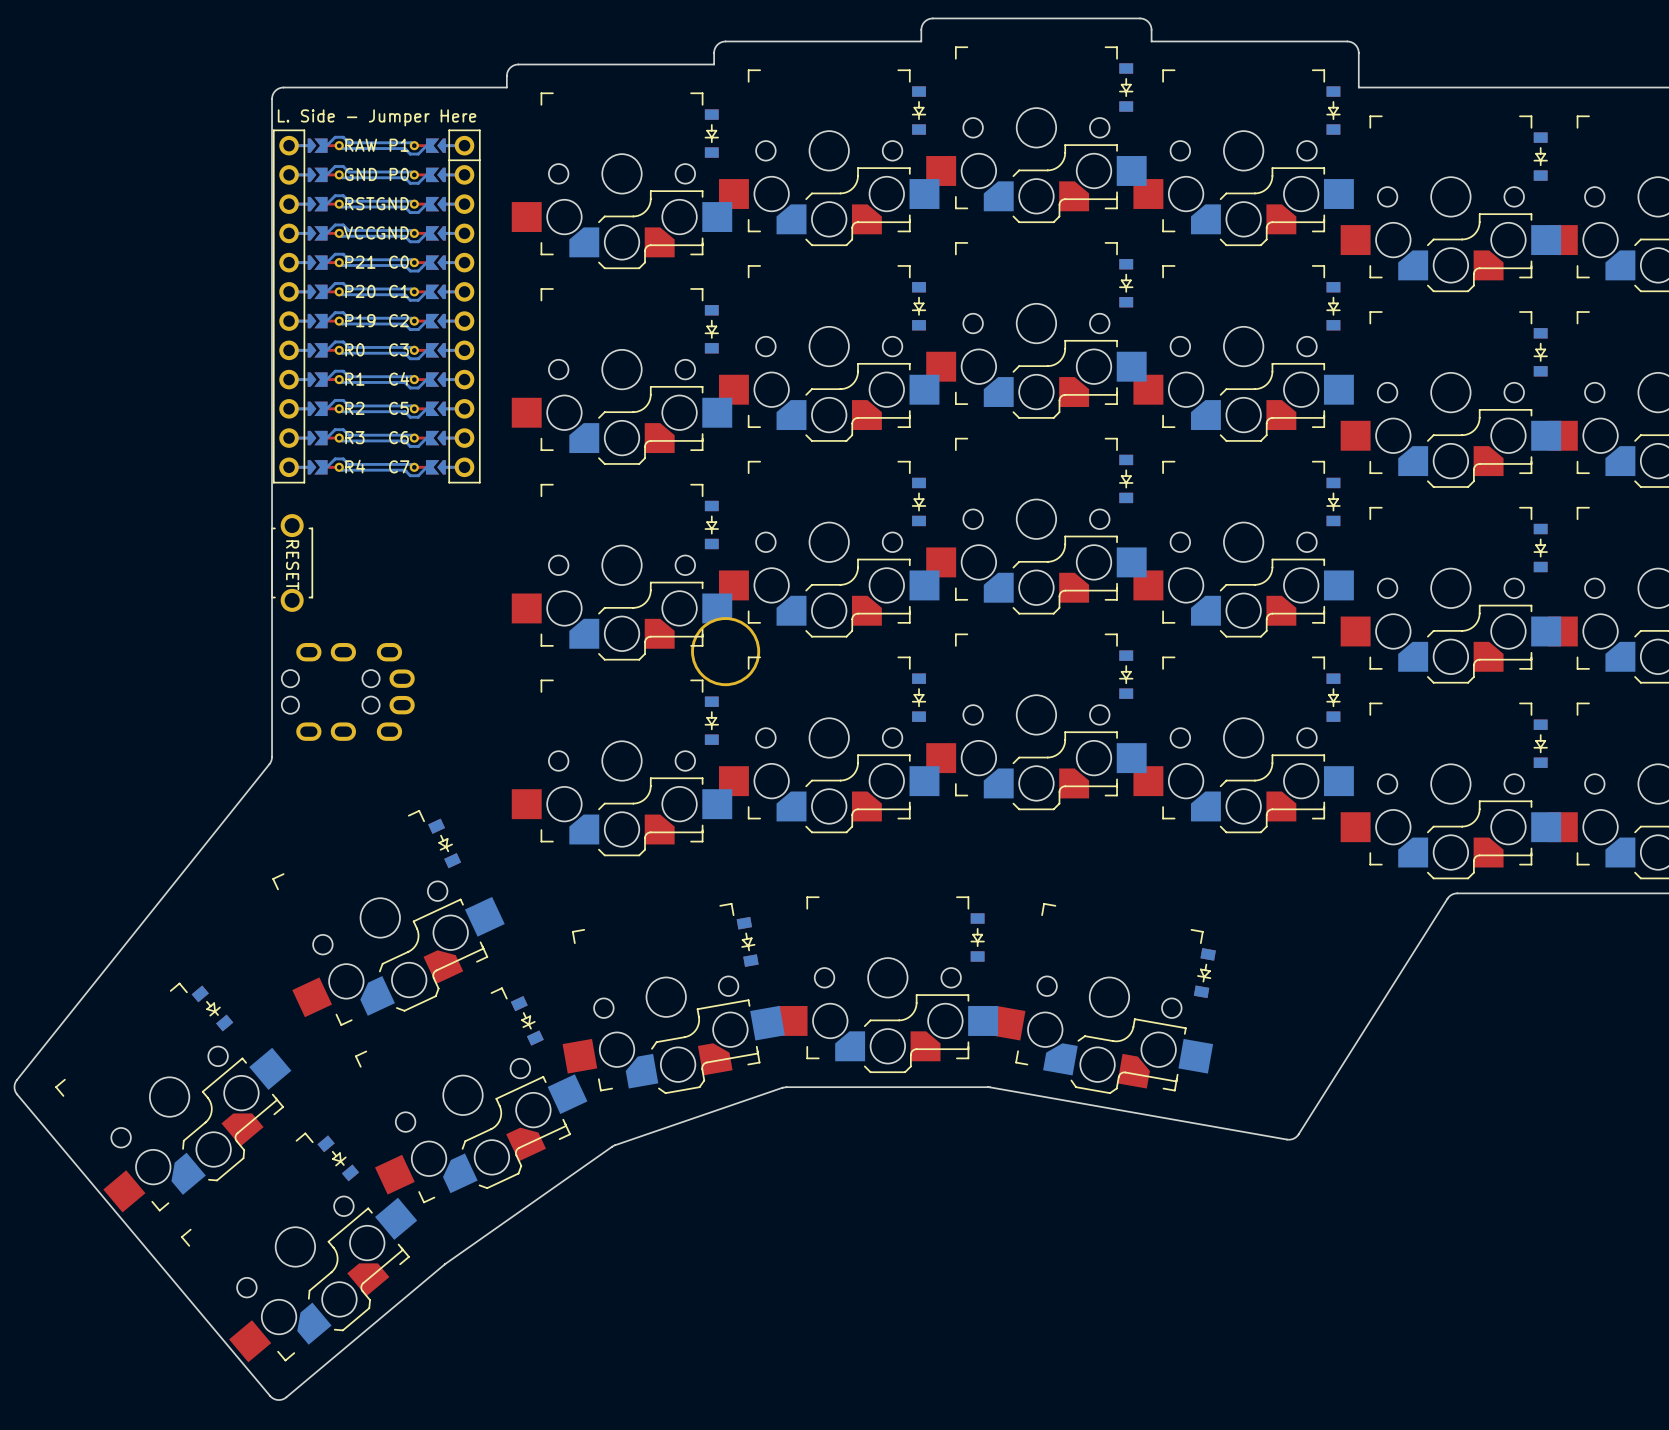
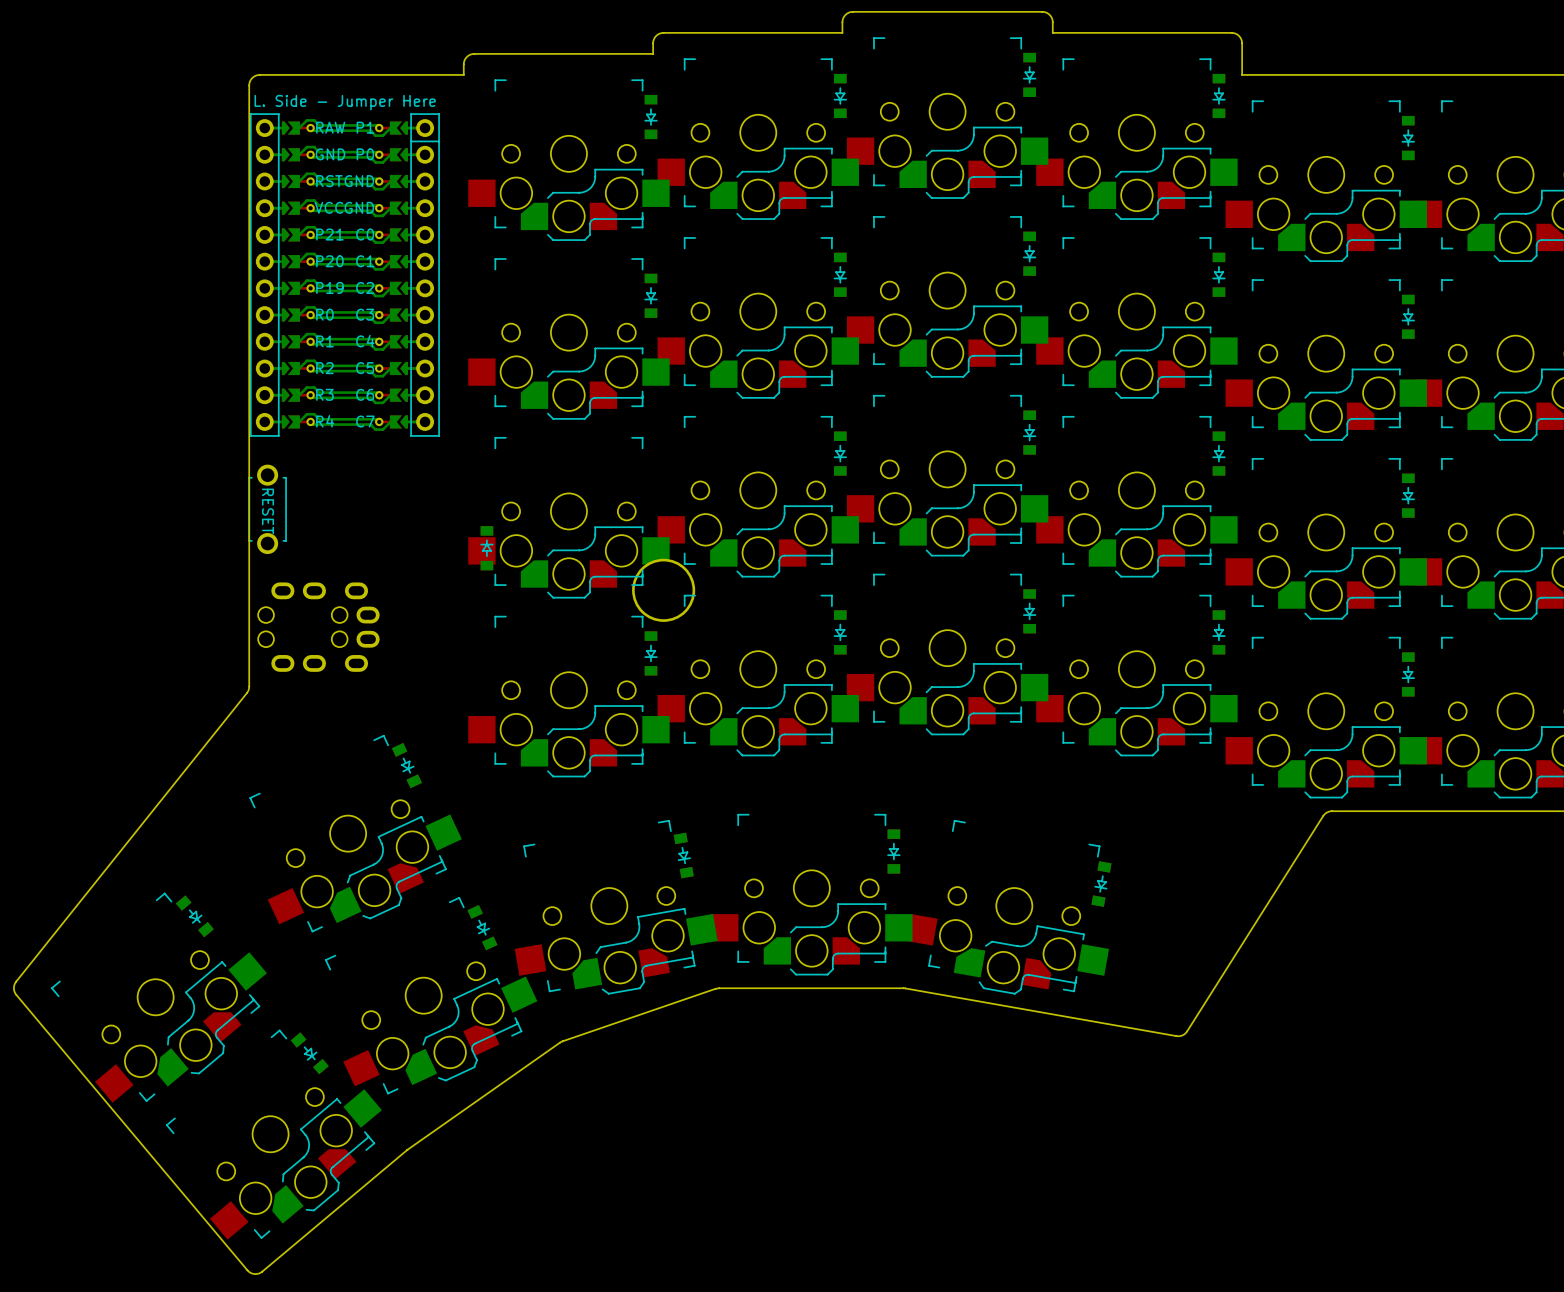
part rotation: 0° (711, 524) -> 180° (486, 548)
part position: (711, 524) -> (486, 548)

